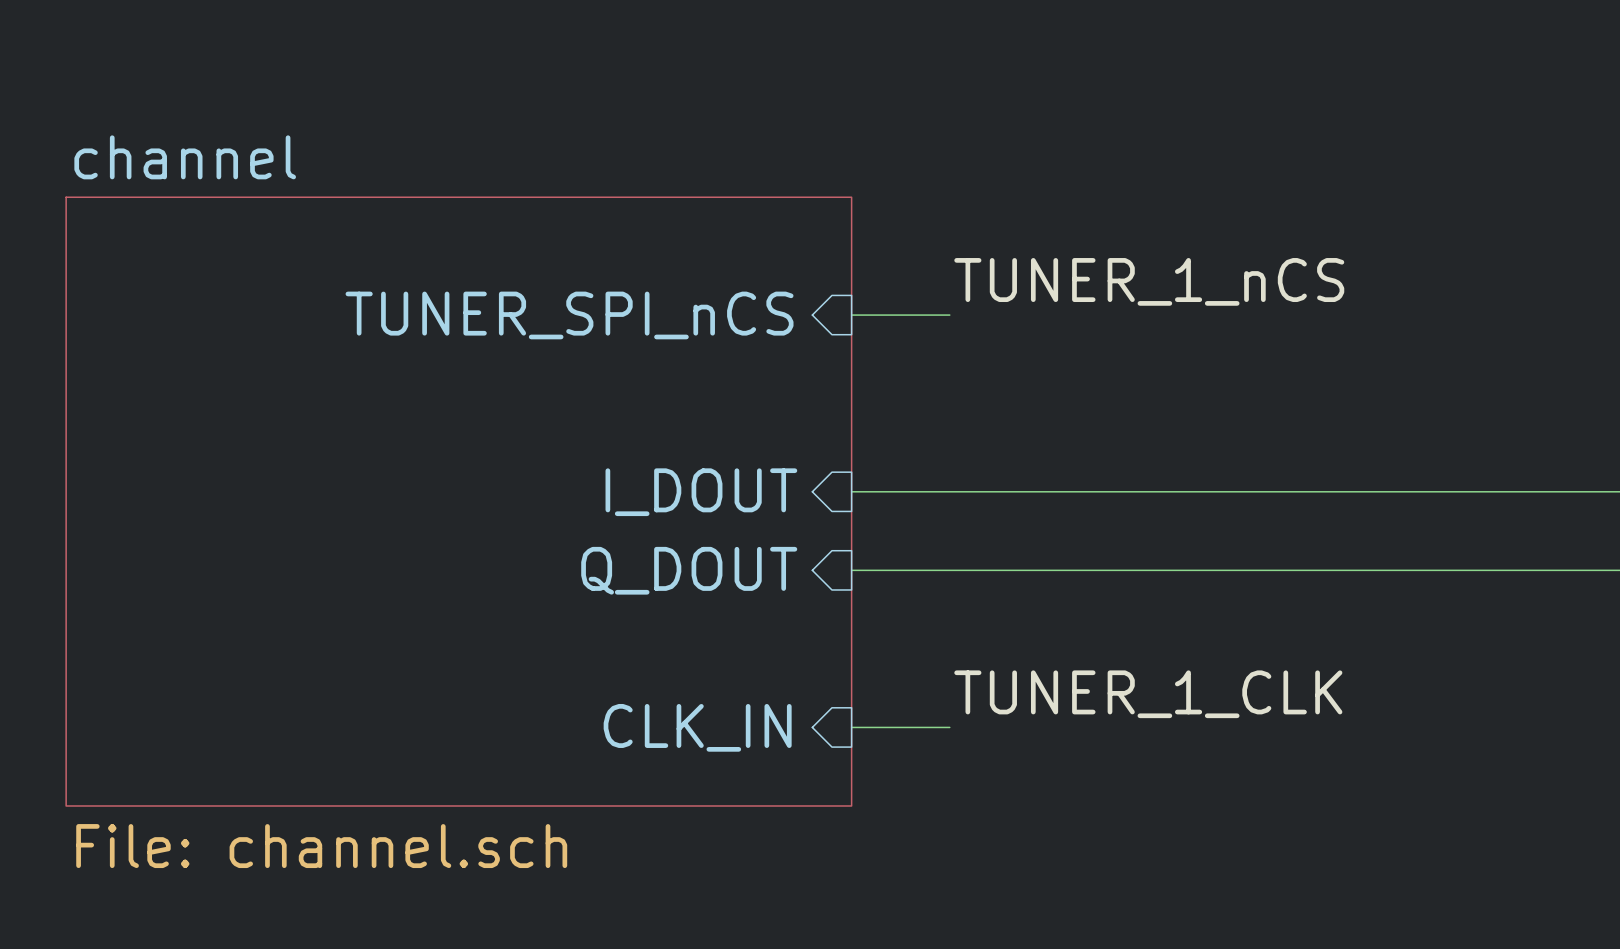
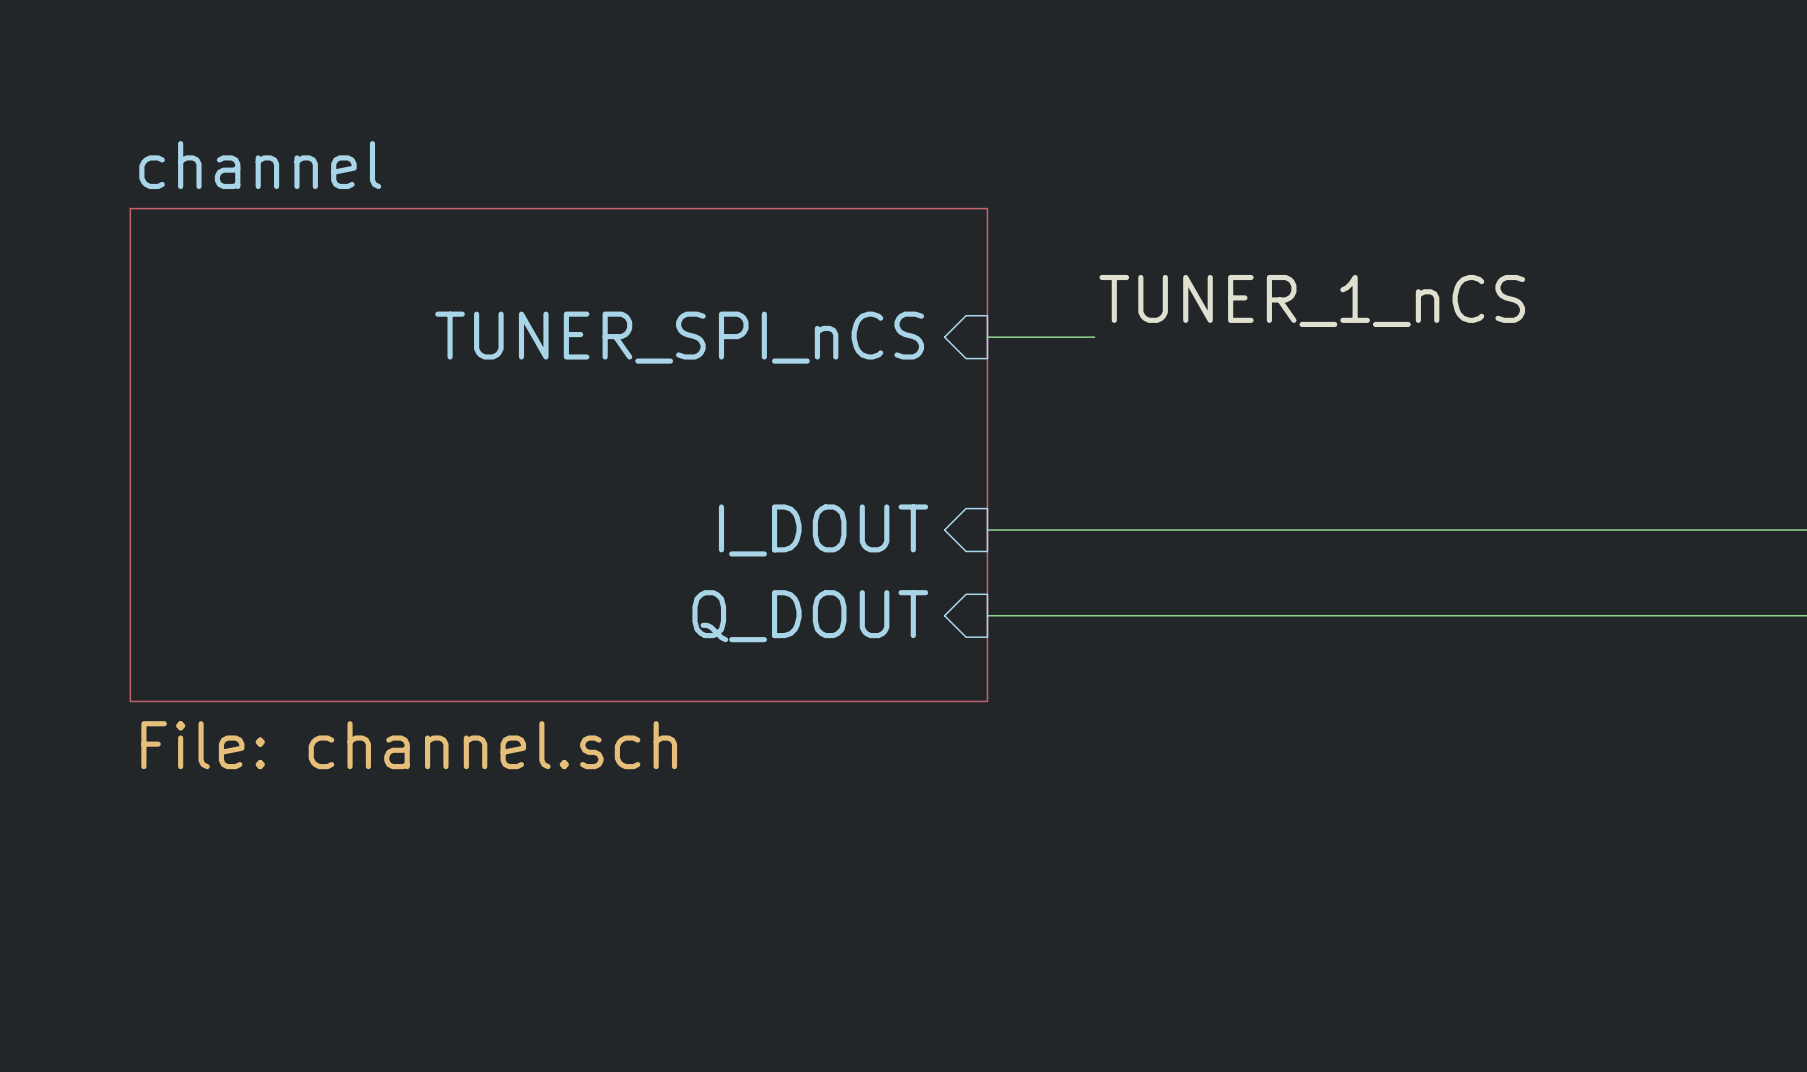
sheet channel: none -> File: channel.sch (558, 455)
sheet channel: File: channel.sch (458, 501) -> none
label: TUNER_1_CLK (1148, 694) -> none
sheet pin: CLK_IN (697, 727) -> none
wire: (851, 727) (949, 727) -> none

